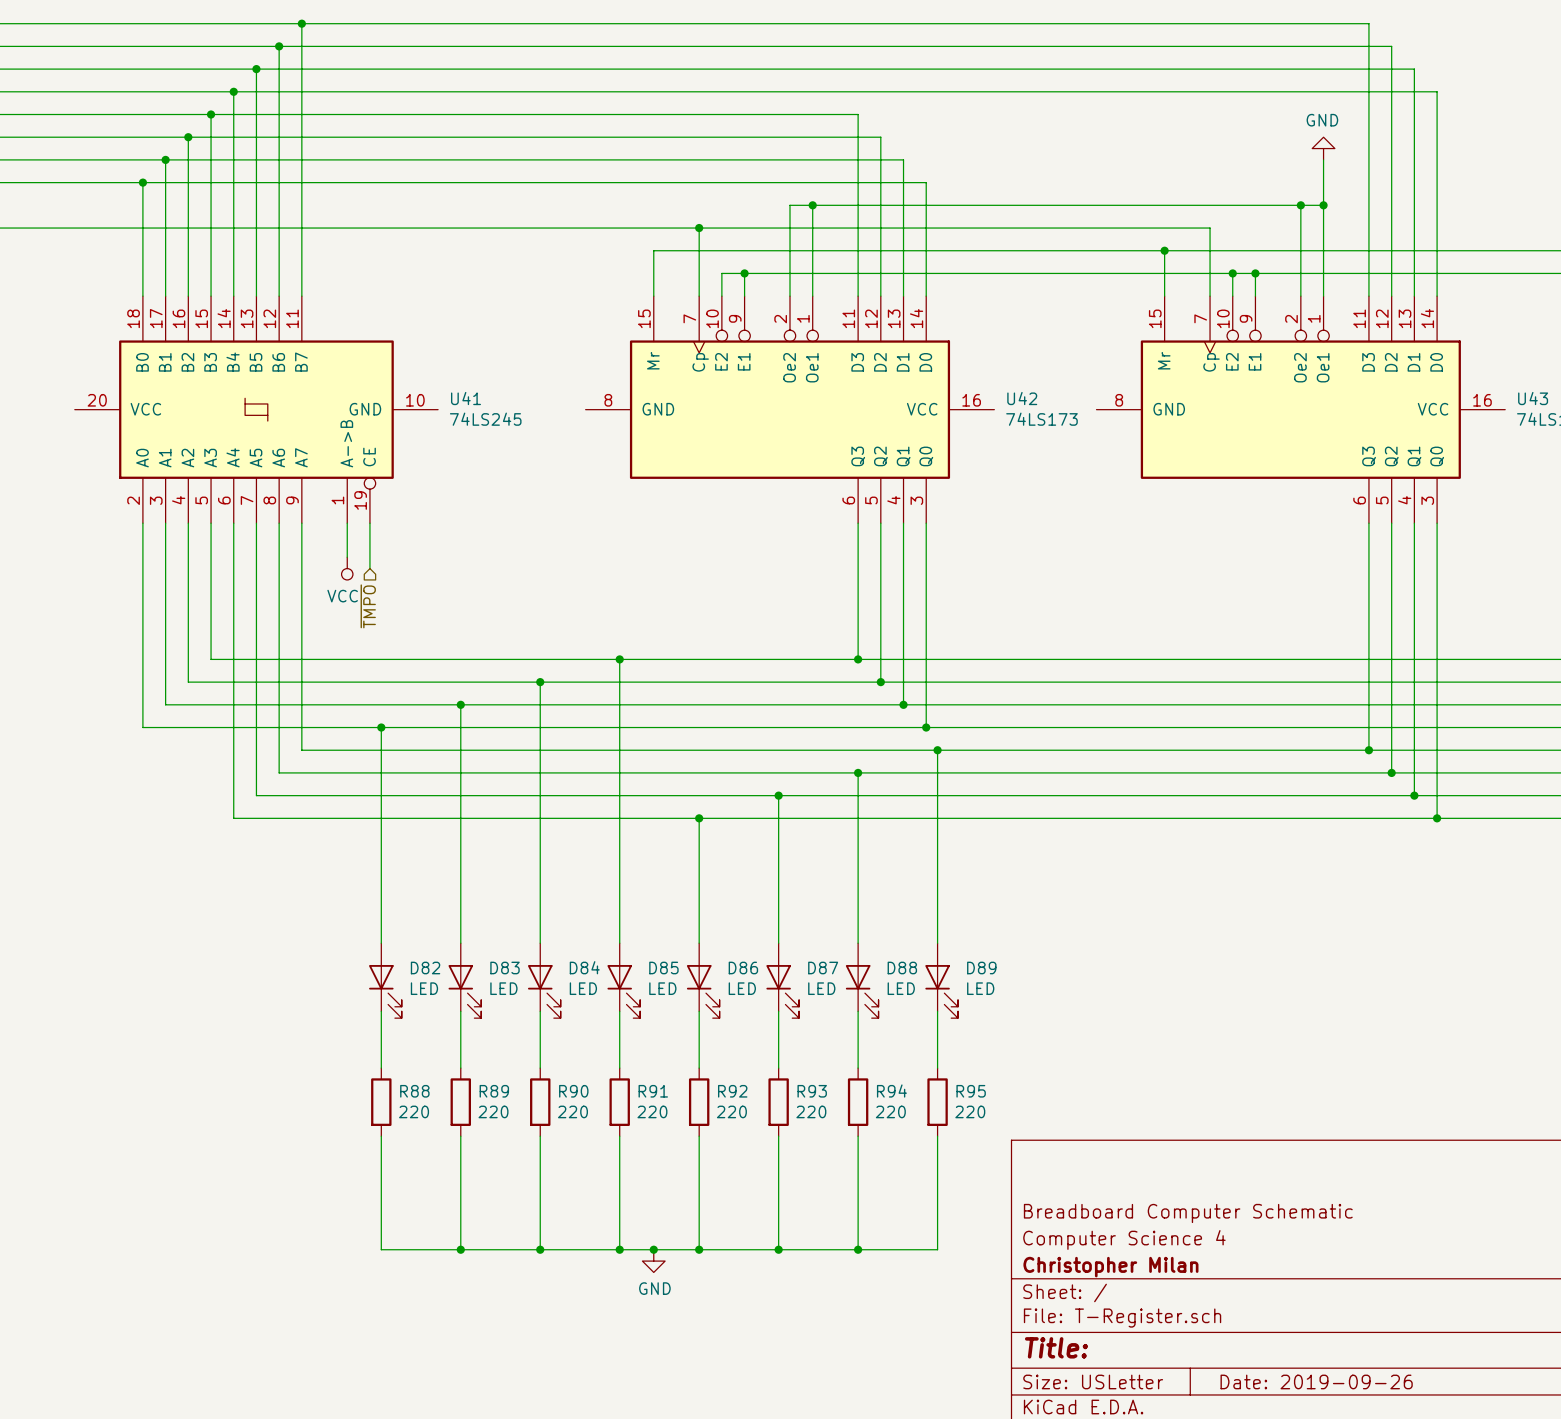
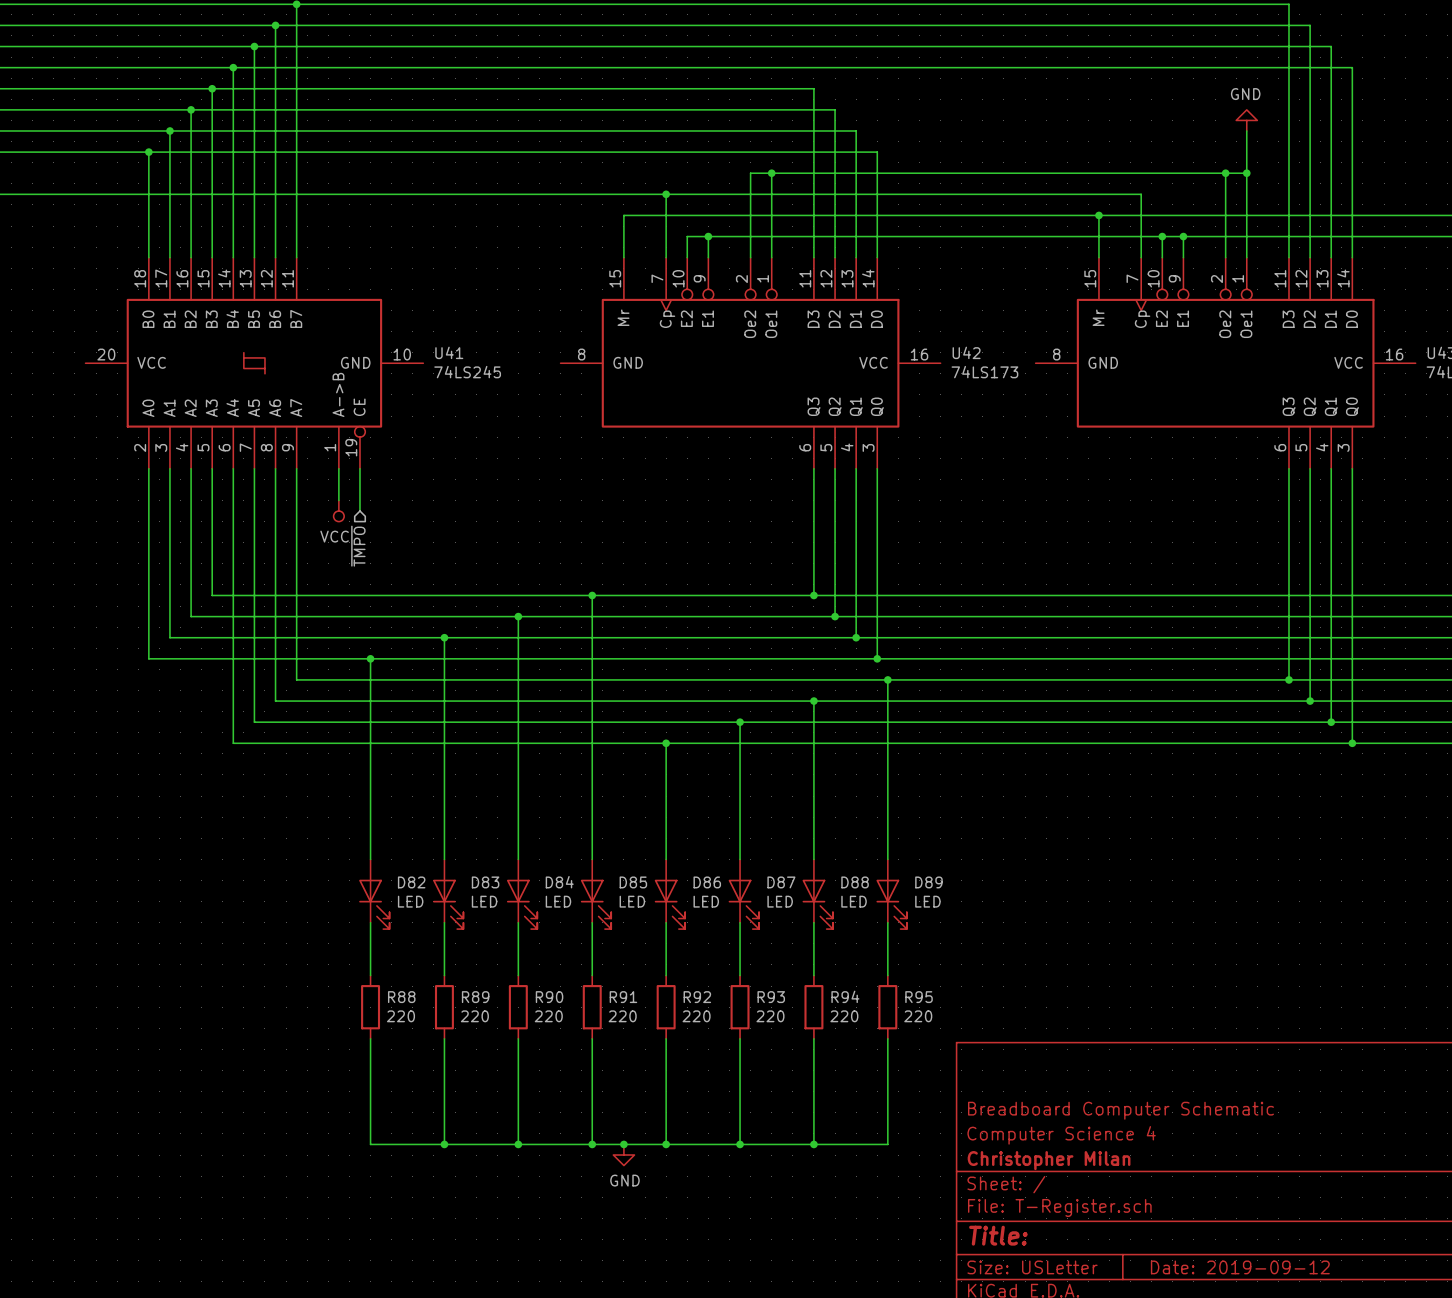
title block: Date: 2019-09-26 (1316, 1381) -> Date: 2019-09-12 (1240, 1267)

